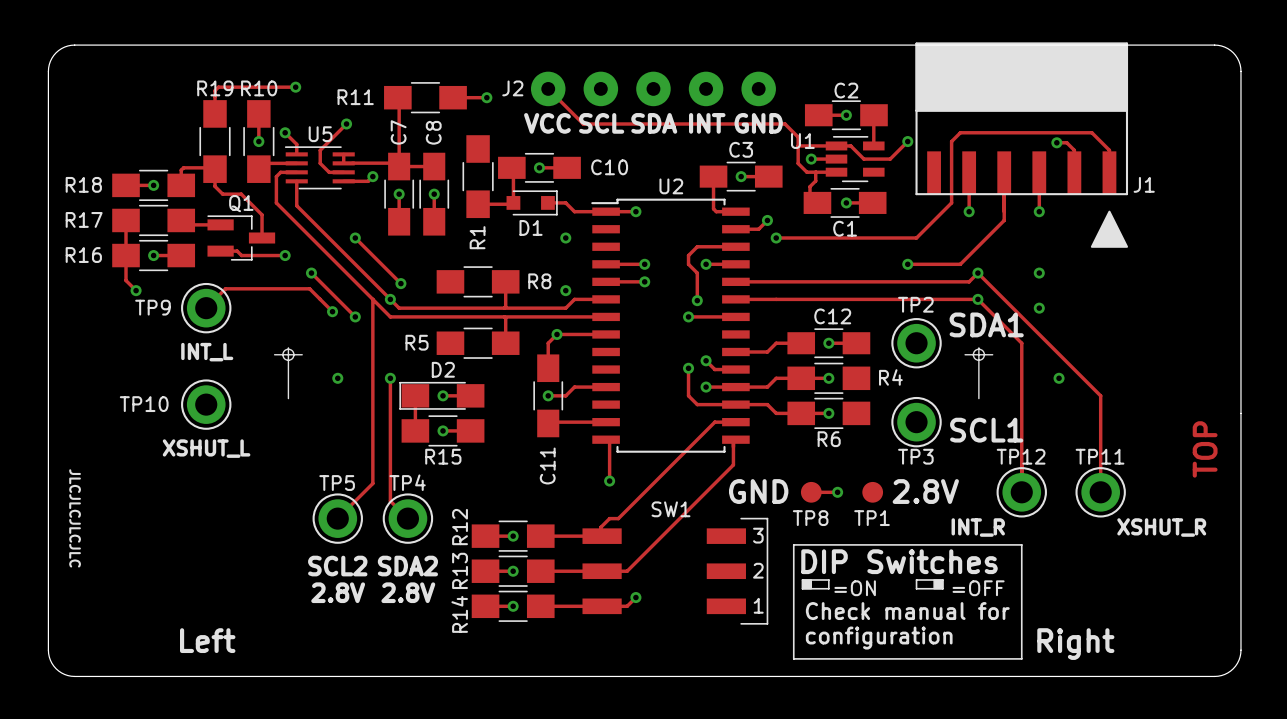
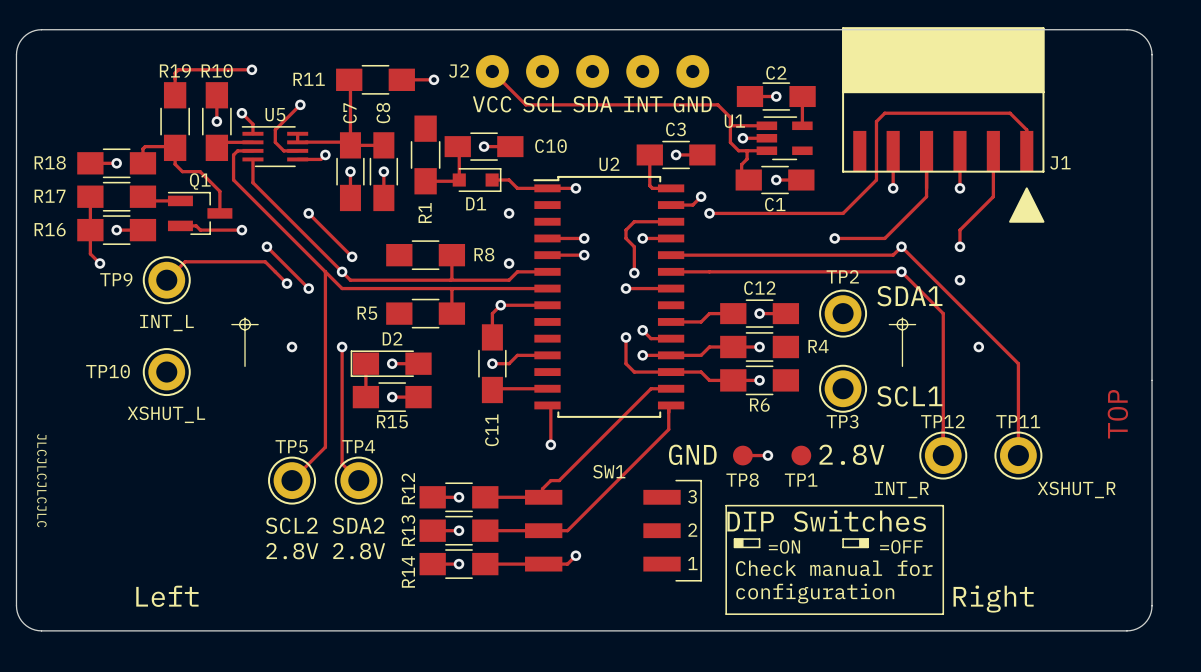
track: (907, 141) (890, 159) (863, 159) (850, 145) (836, 145) -> none
via: (907, 141) -> none
track: (1056, 142) (1066, 142) (1074, 150) (1074, 168) -> (959, 246) (959, 230) (993, 196) (993, 147)
via: (1056, 142) -> none

